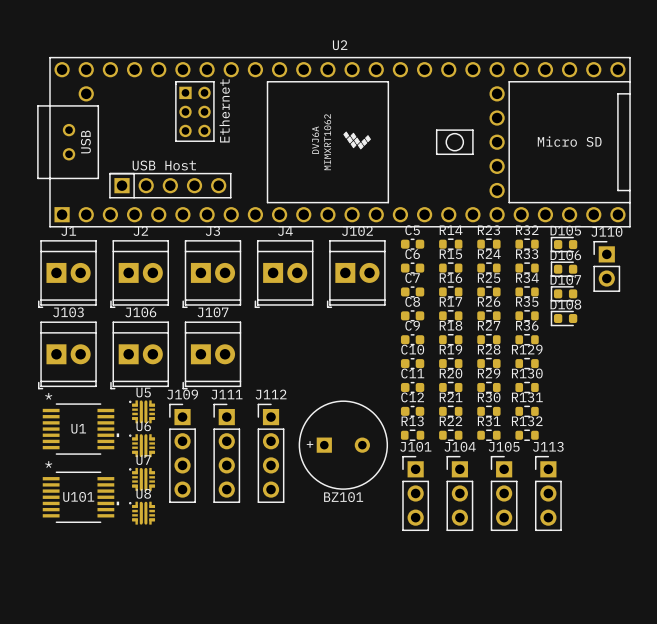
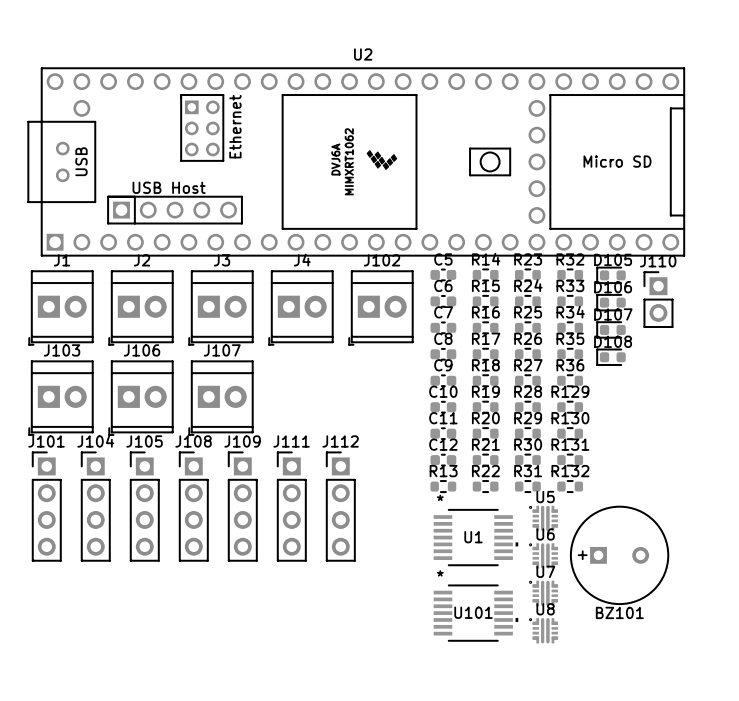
U5 position: (142, 411) -> (543, 518)
U1 position: (80, 429) -> (475, 537)
U6 position: (142, 445) -> (543, 555)
BZ101 position: (343, 445) -> (619, 555)
J109 position: (182, 453) -> (242, 506)
J108: none -> (193, 506)
J111 position: (226, 453) -> (291, 506)
J112 position: (271, 453) -> (340, 506)
J101 footprint: [402, 456, 429, 531] -> [32, 451, 62, 562]
J104 footprint: [446, 456, 474, 531] -> [81, 451, 111, 562]
J105 footprint: [490, 456, 518, 531] -> [130, 451, 160, 562]
U7 position: (142, 479) -> (543, 593)
J113: (548, 493) -> none
U101 position: (80, 497) -> (475, 613)
U8 position: (142, 513) -> (543, 630)

